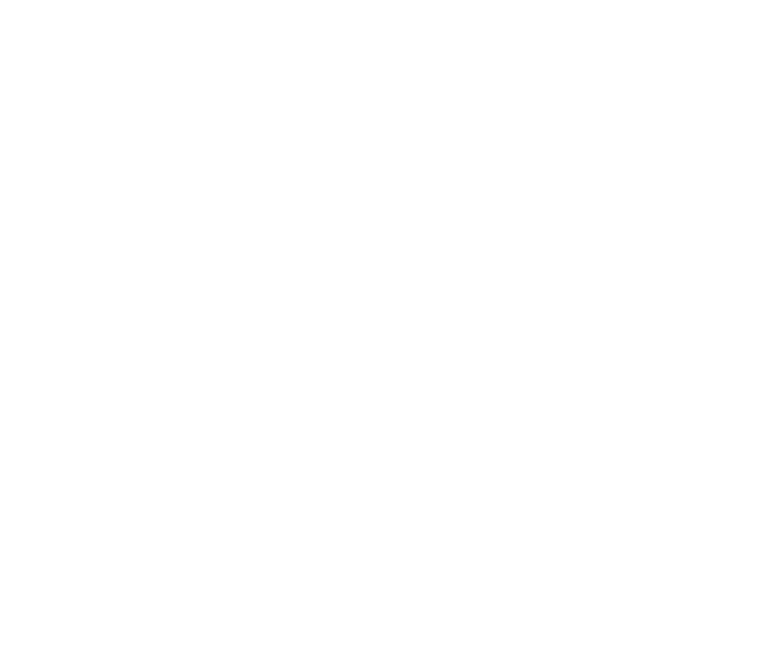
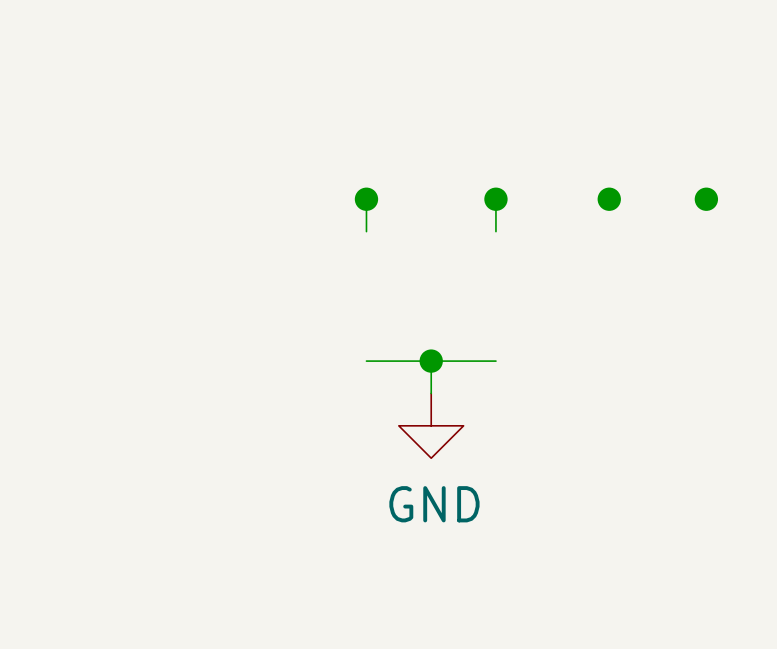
wire: none -> (366, 199) (366, 231)
junction: none -> (366, 199)
wire: none -> (495, 199) (495, 231)
junction: none -> (495, 199)
junction: none -> (609, 199)
junction: none -> (706, 199)
wire: none -> (366, 361) (495, 361)
wire: none -> (431, 361) (431, 393)
junction: none -> (431, 361)
power symbol: none -> GND (431, 425)

